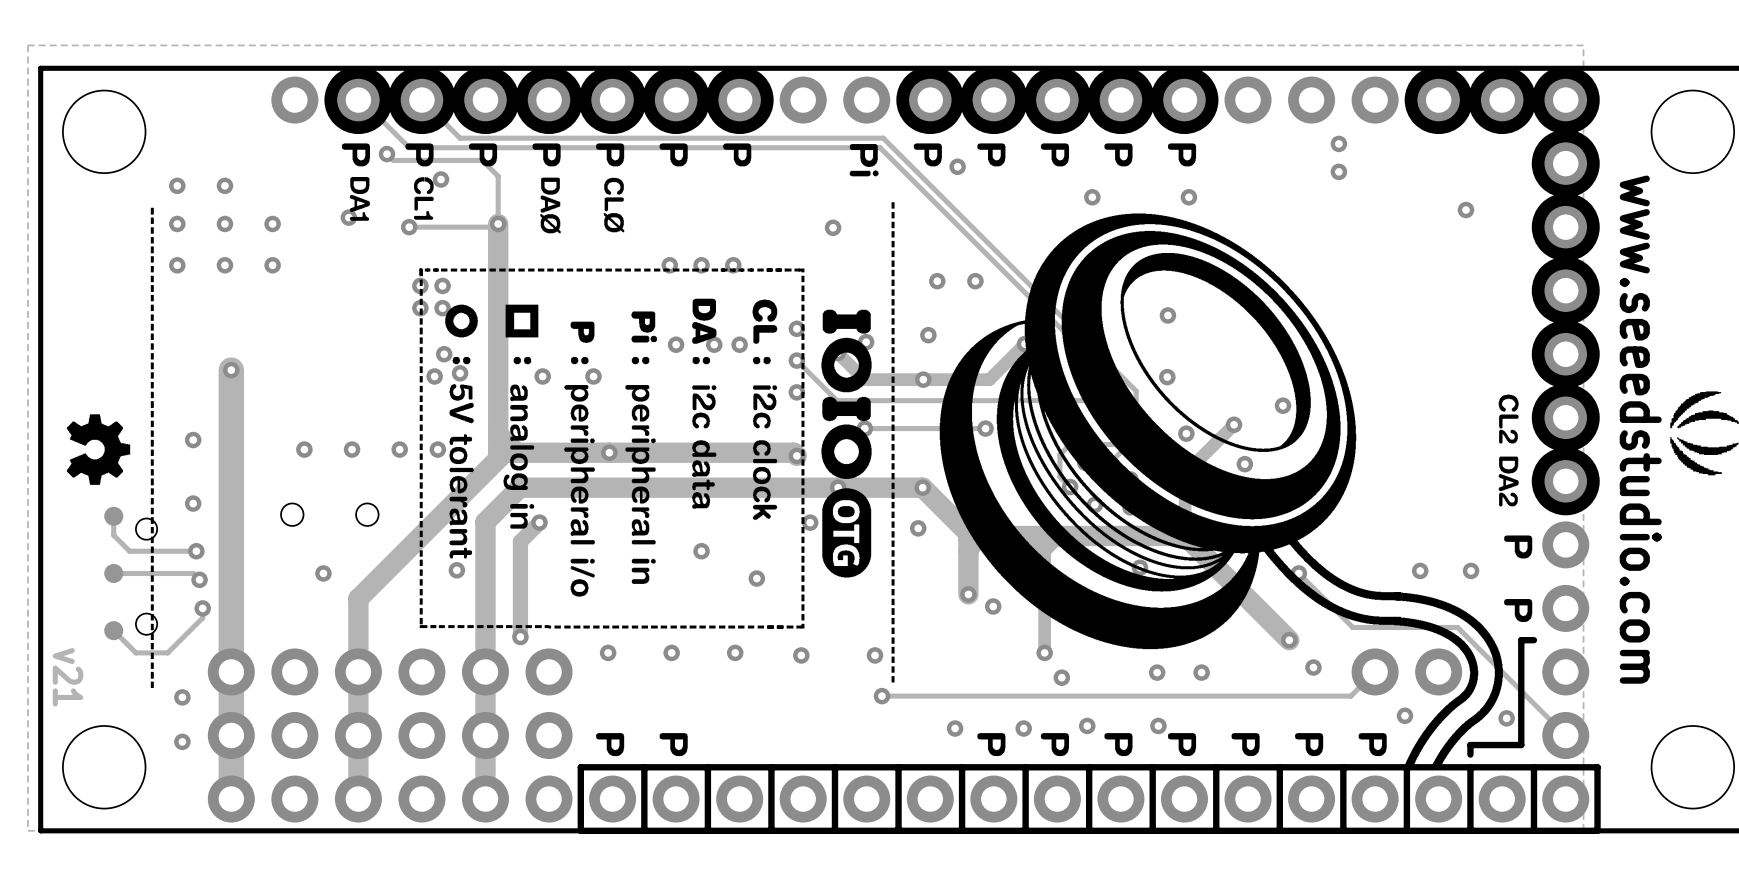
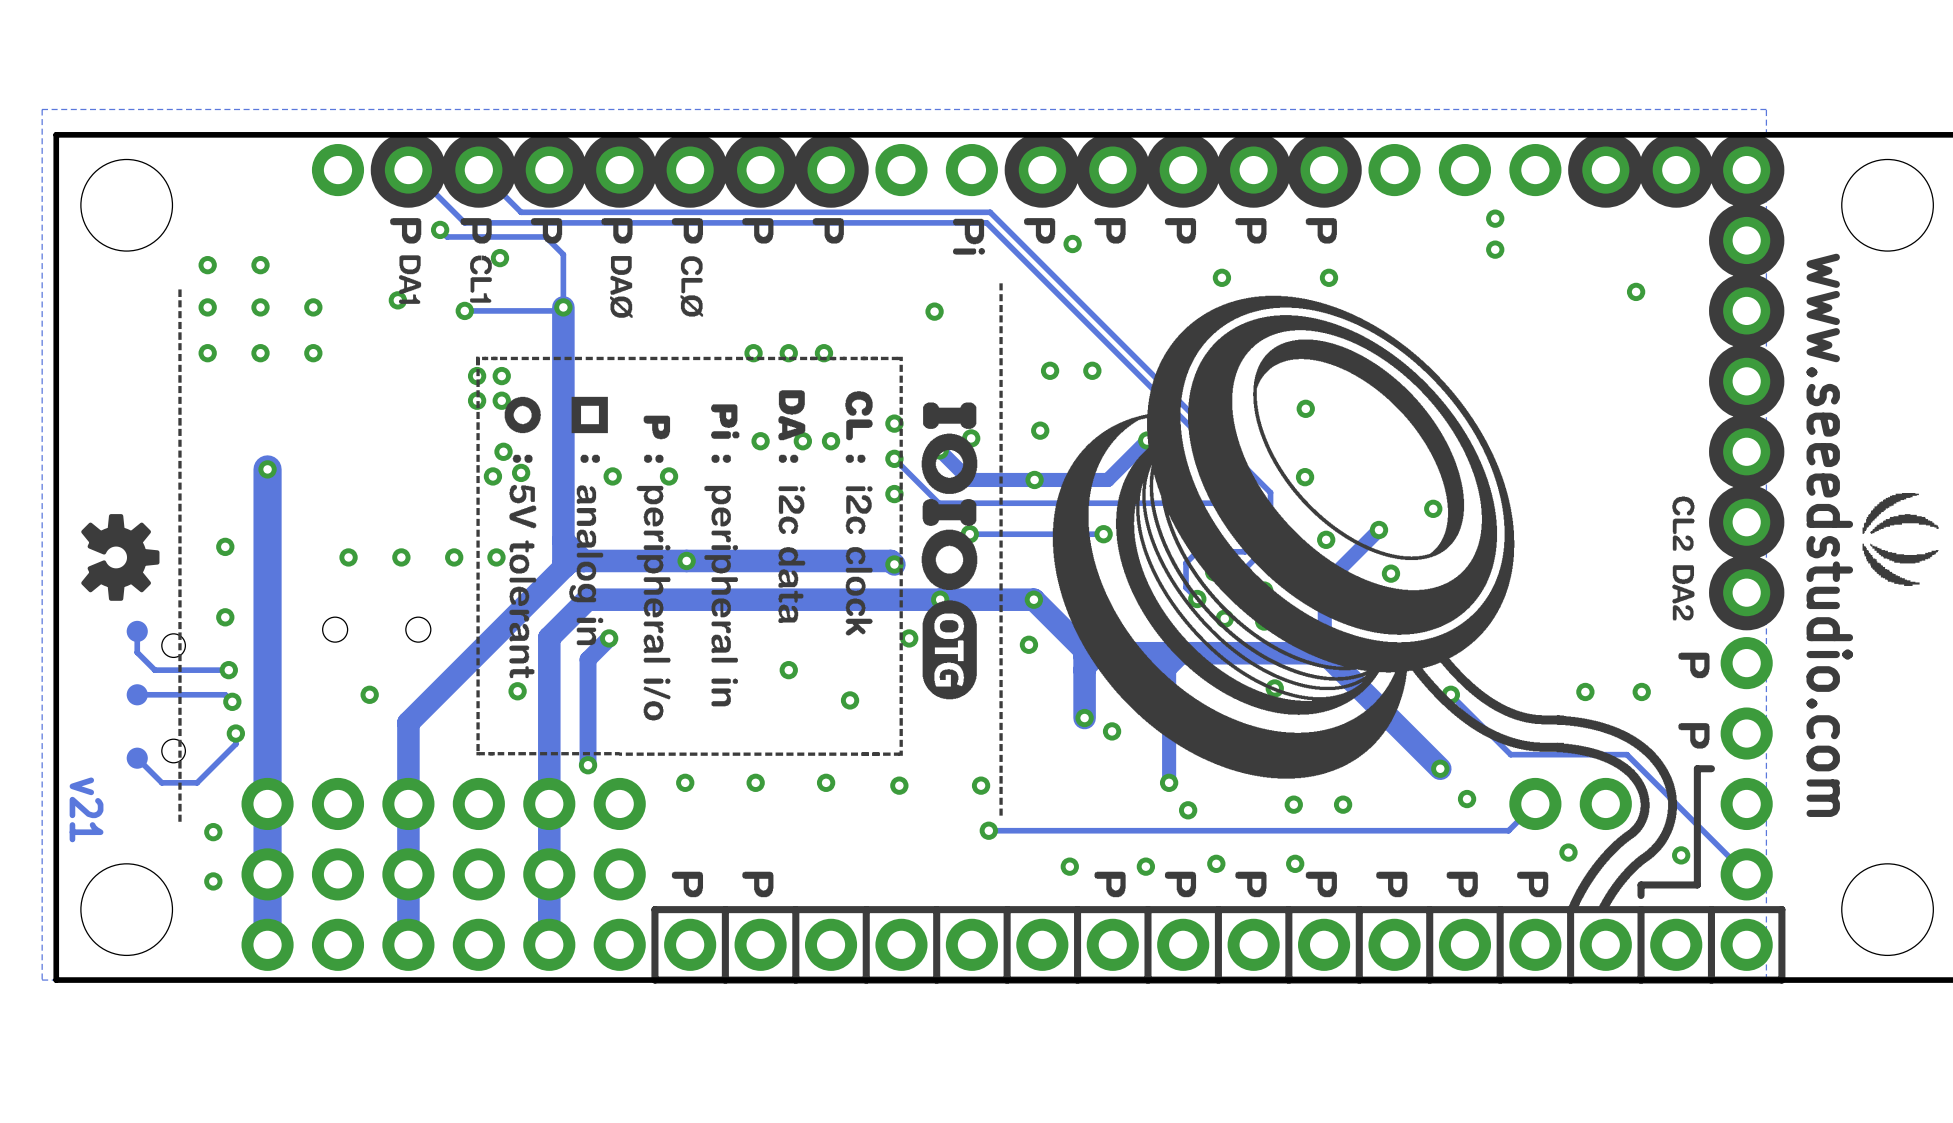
drawing: none -> [81, 514, 160, 601]
drawing: [66, 414, 131, 485] -> none

